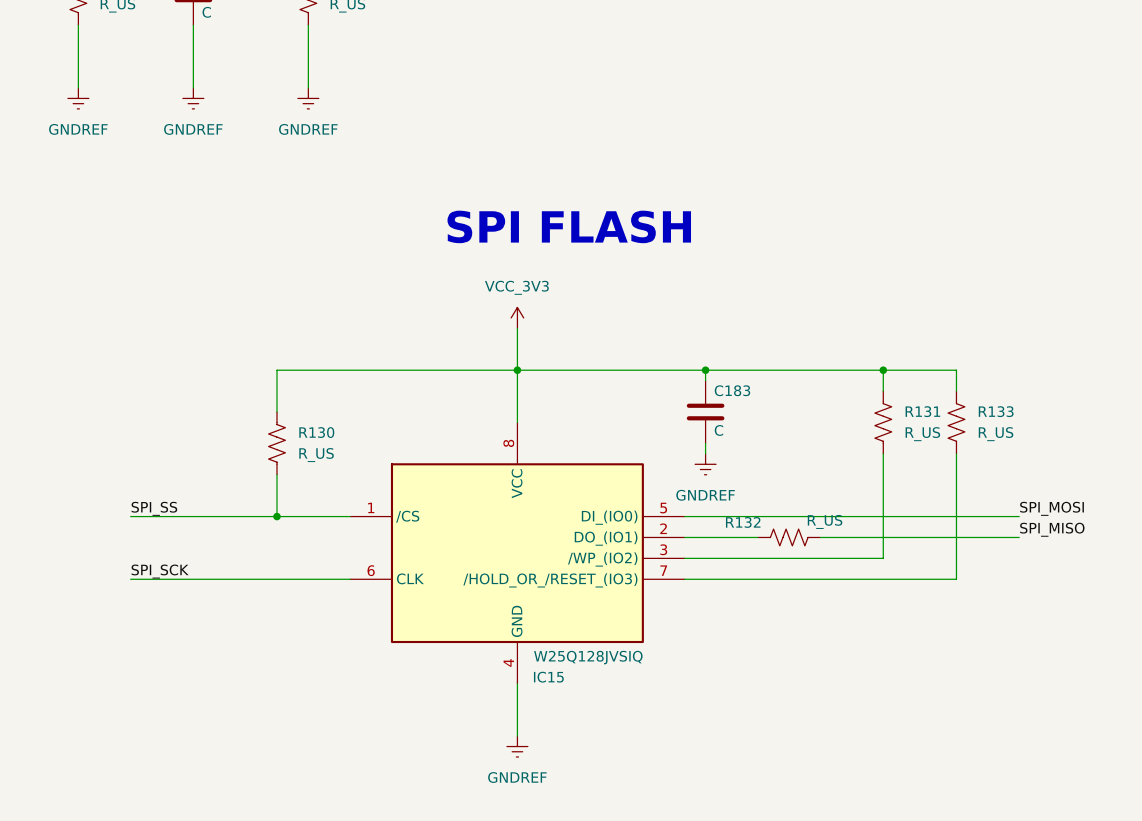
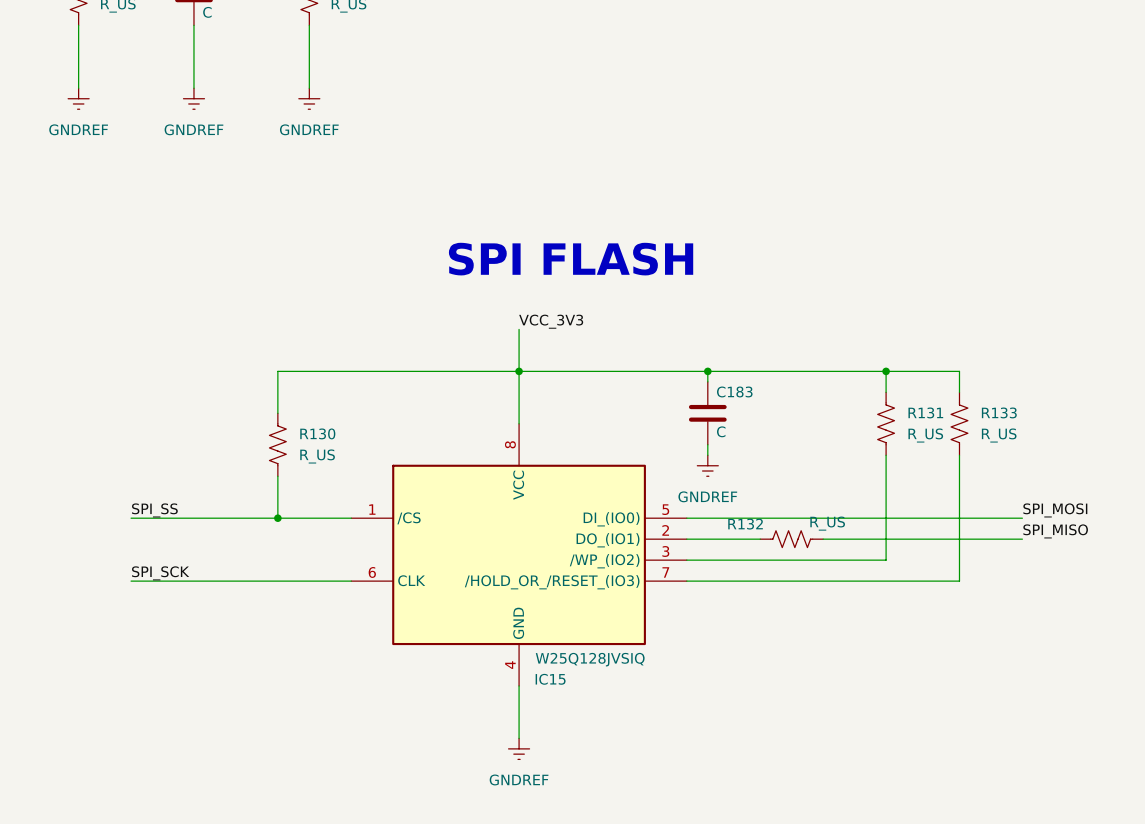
text position: SPI FLASH (569, 226) -> SPI FLASH (571, 259)
power symbol: VCC_3V3 (517, 317) -> none
label: none -> VCC_3V3 (551, 321)

